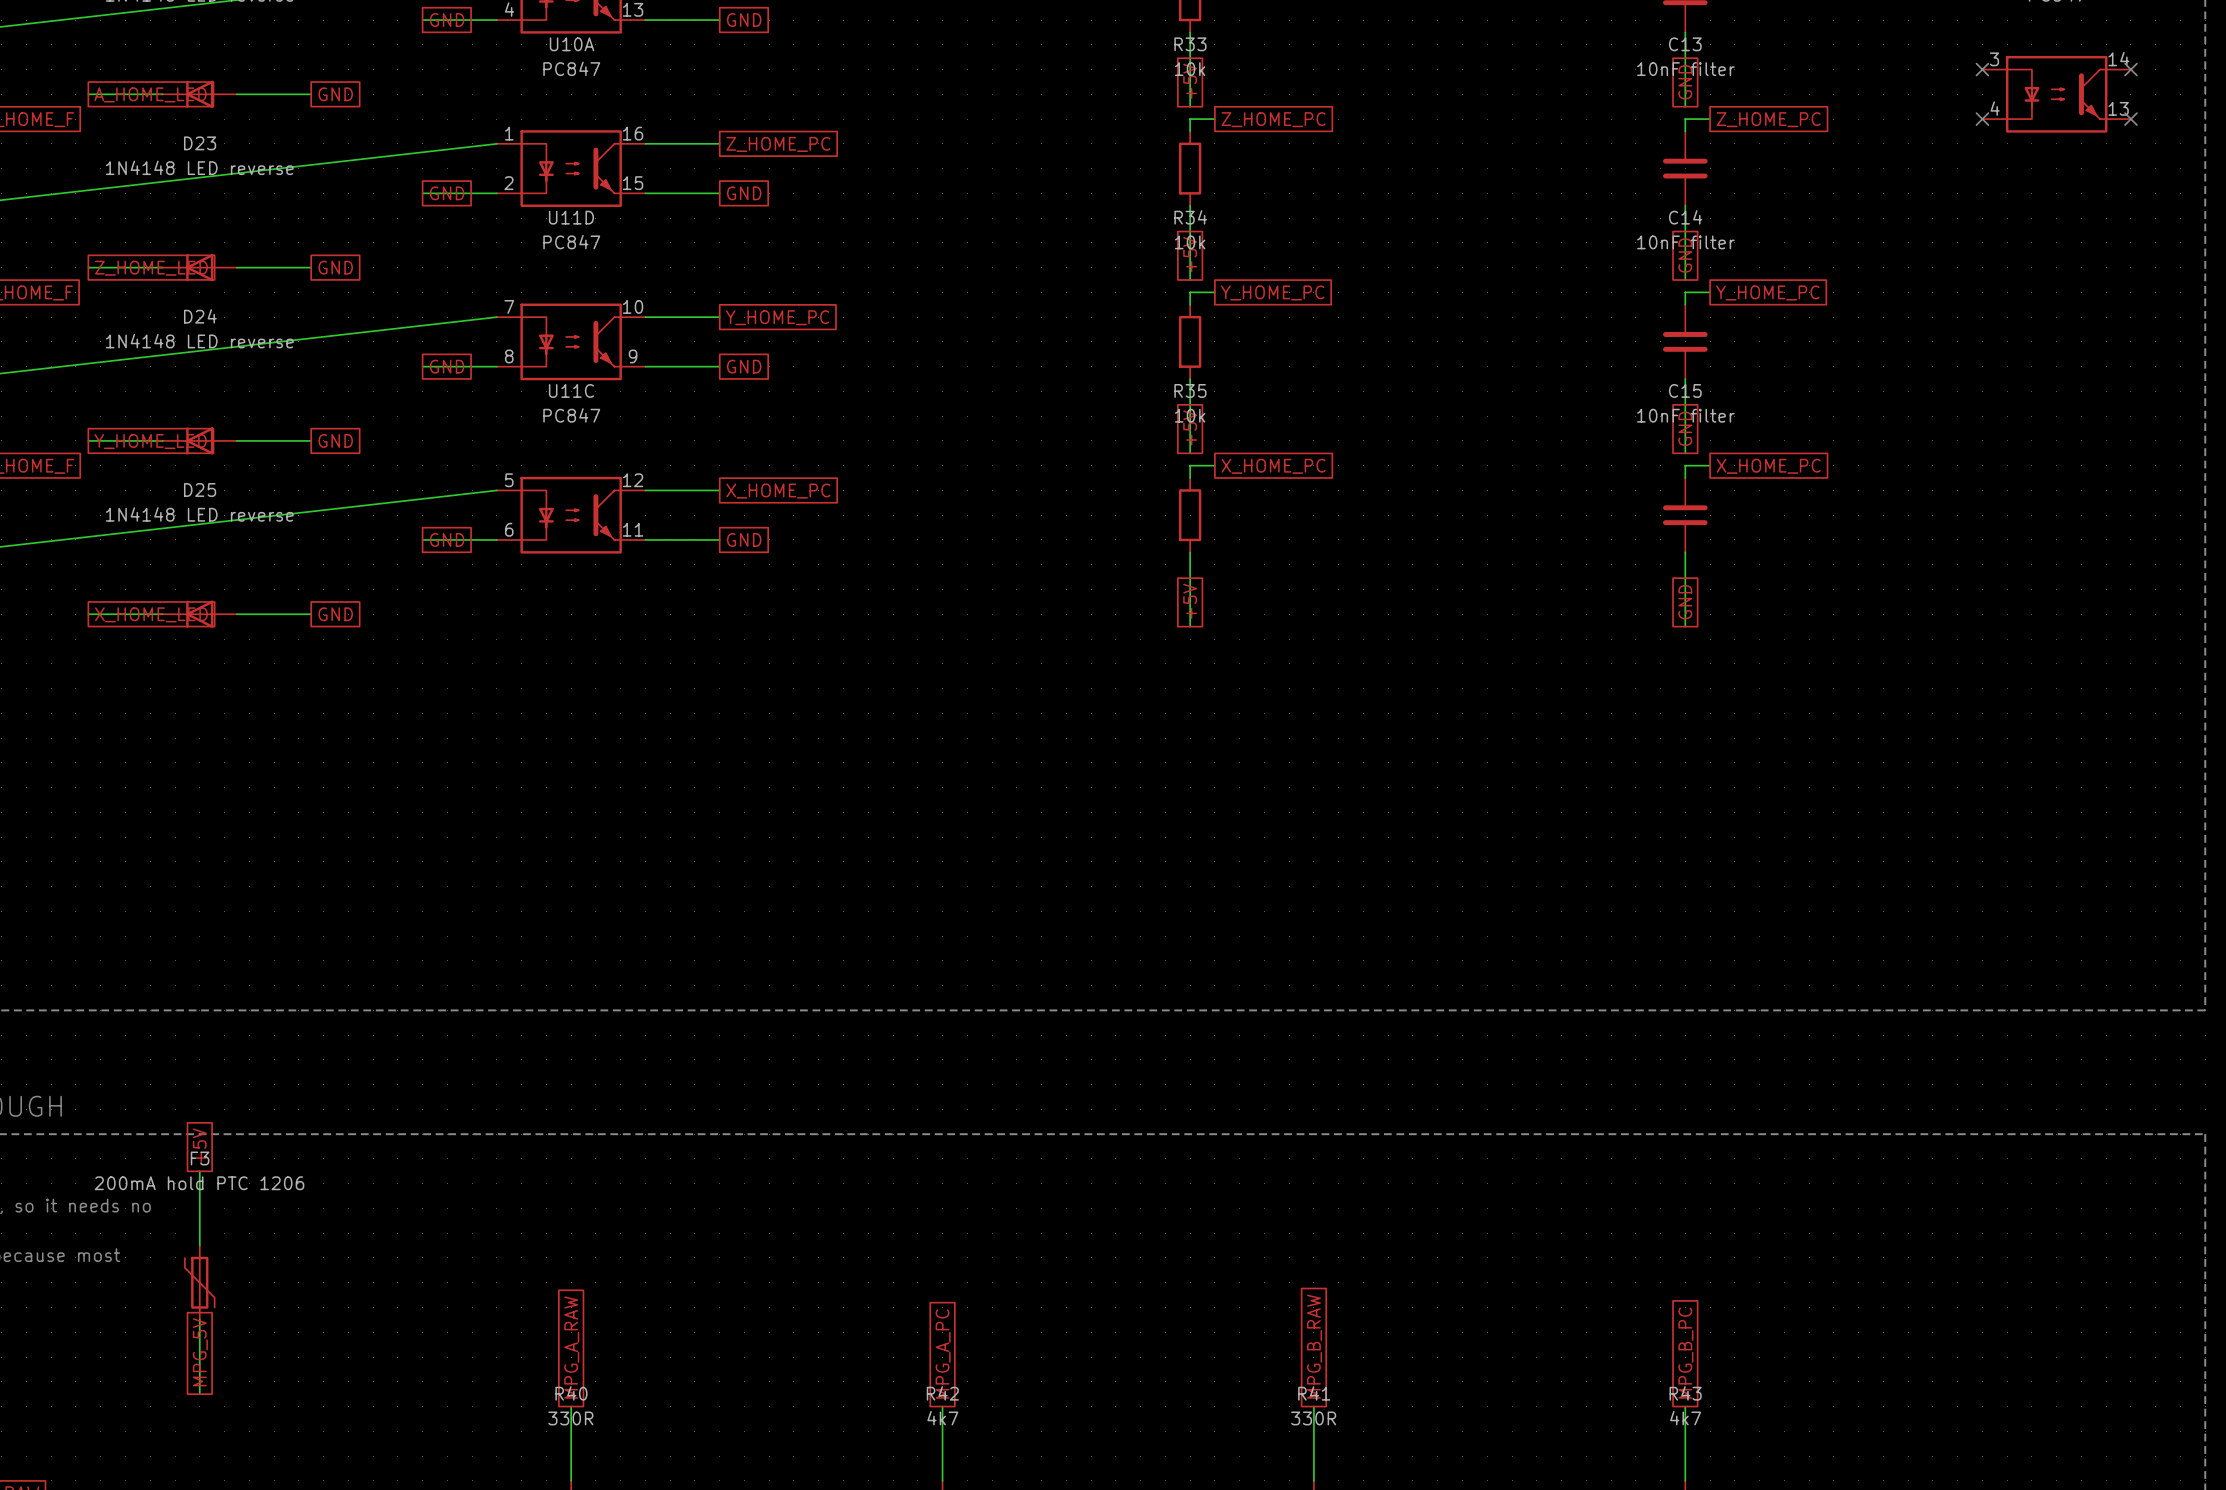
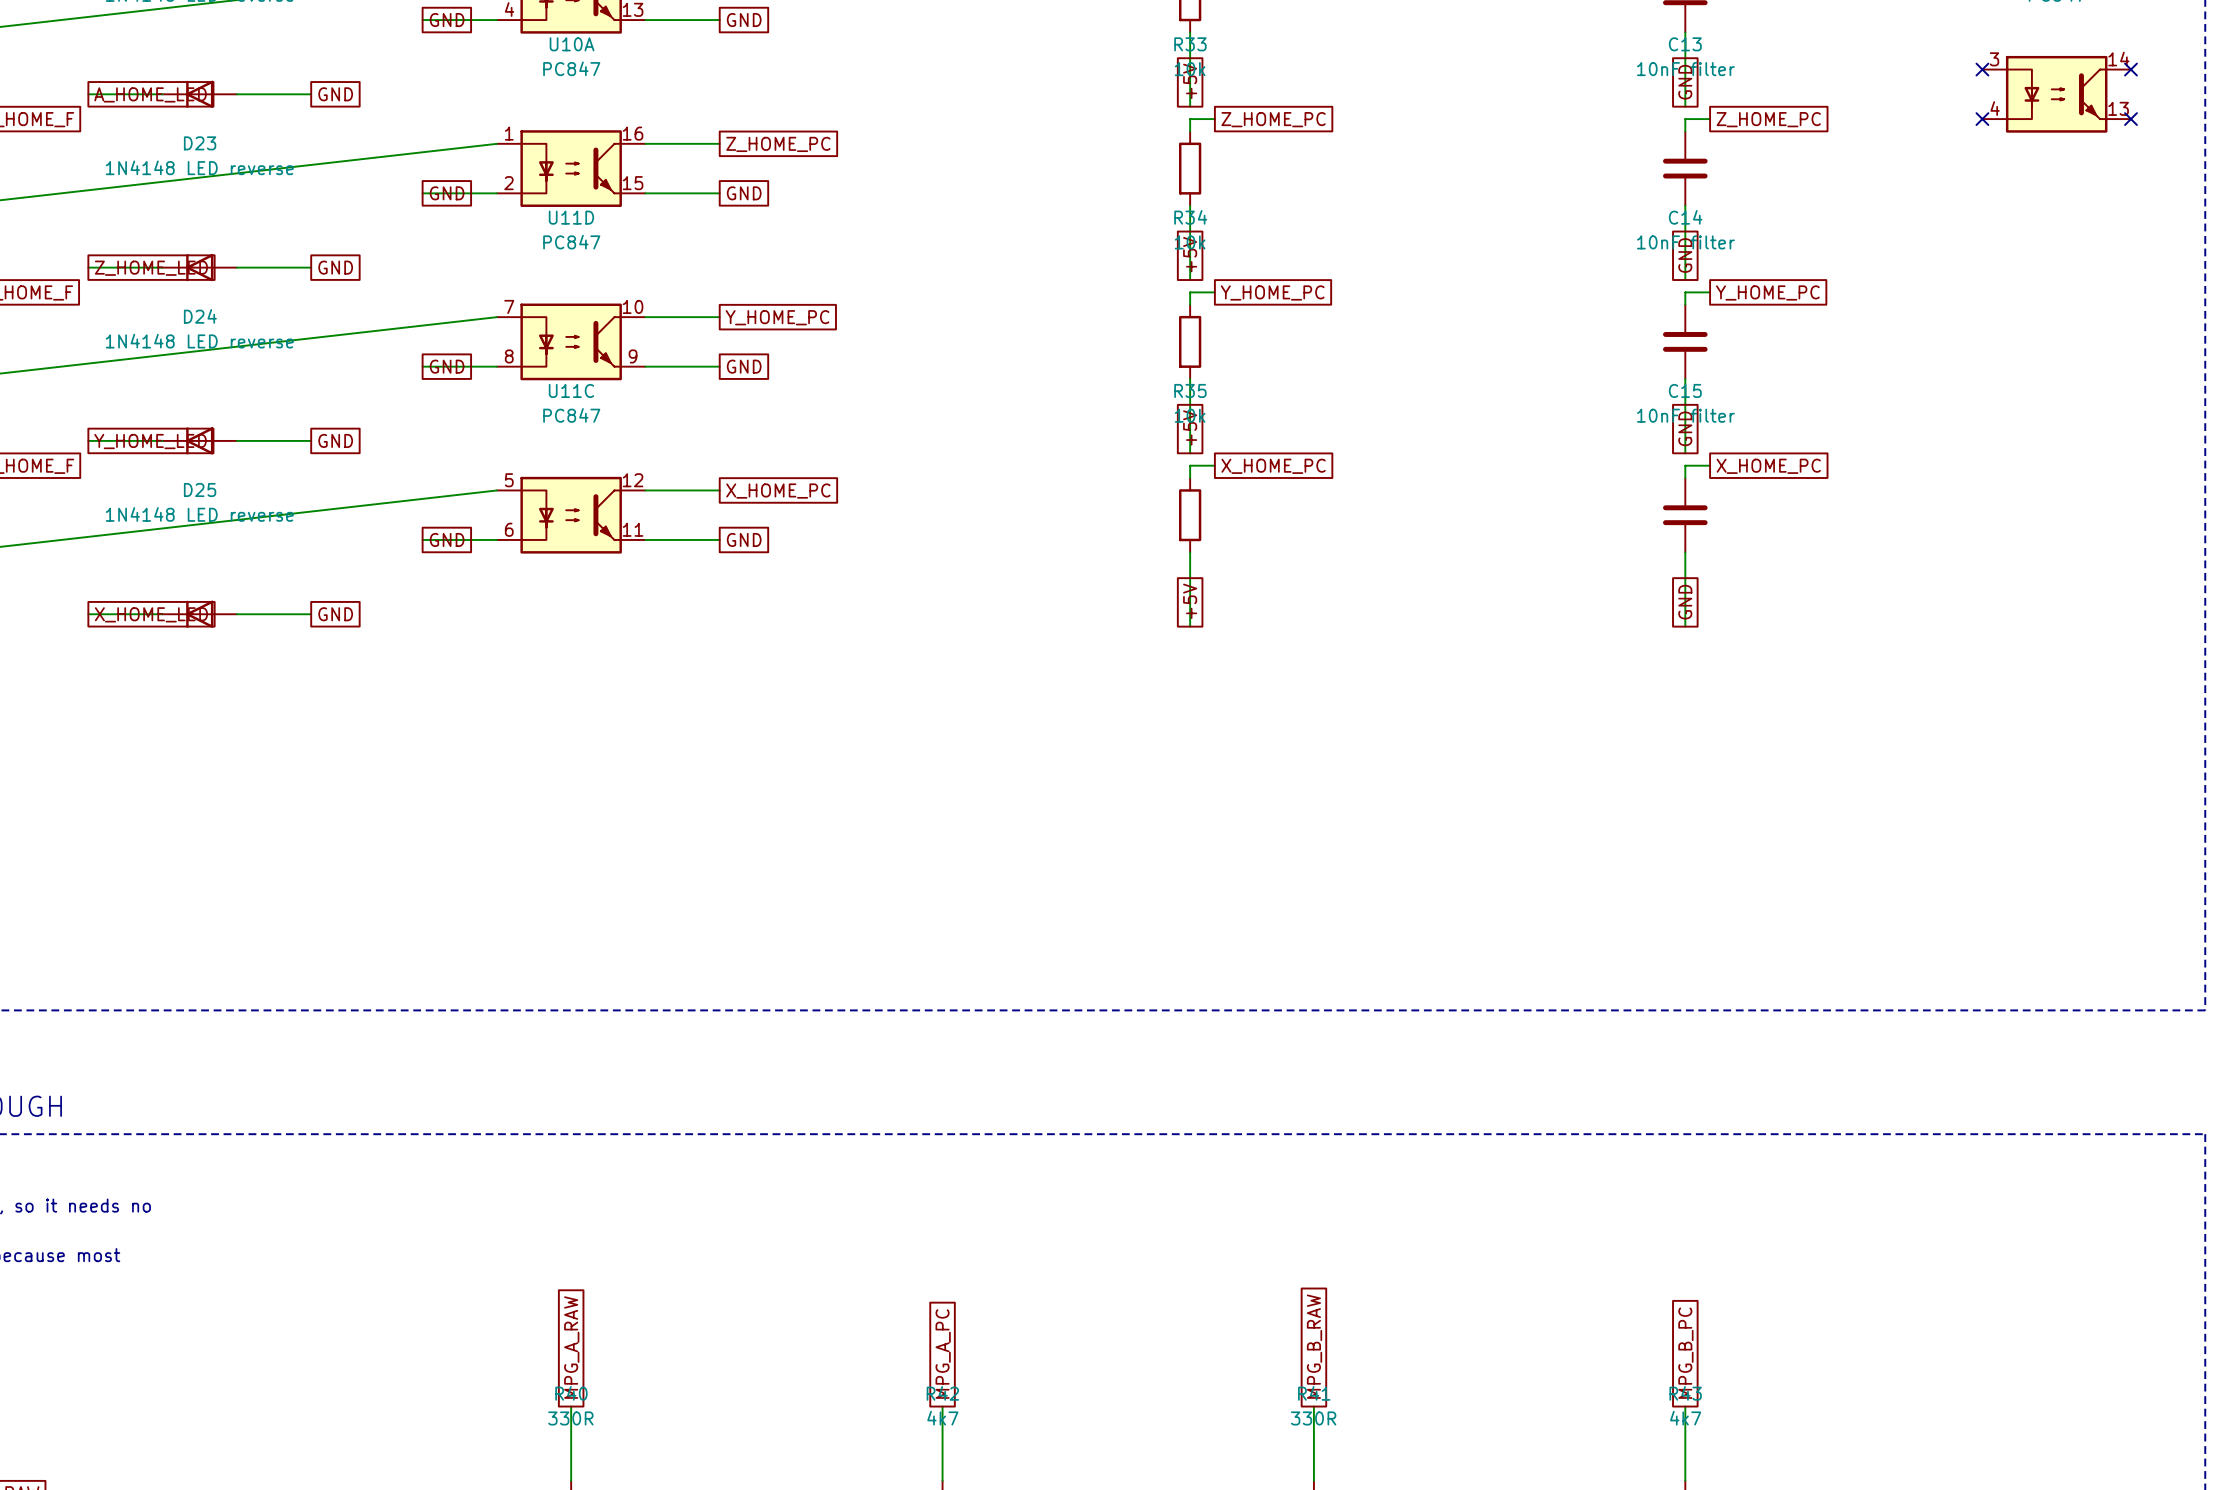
global label: +5V (199, 1145) -> none
wire: (199, 1171) (199, 1245) -> none
F3: 200mA hold PTC 1206 (199, 1282) -> none
wire: (199, 1319) (199, 1394) -> none
global label: MPG_5V (200, 1352) -> none

